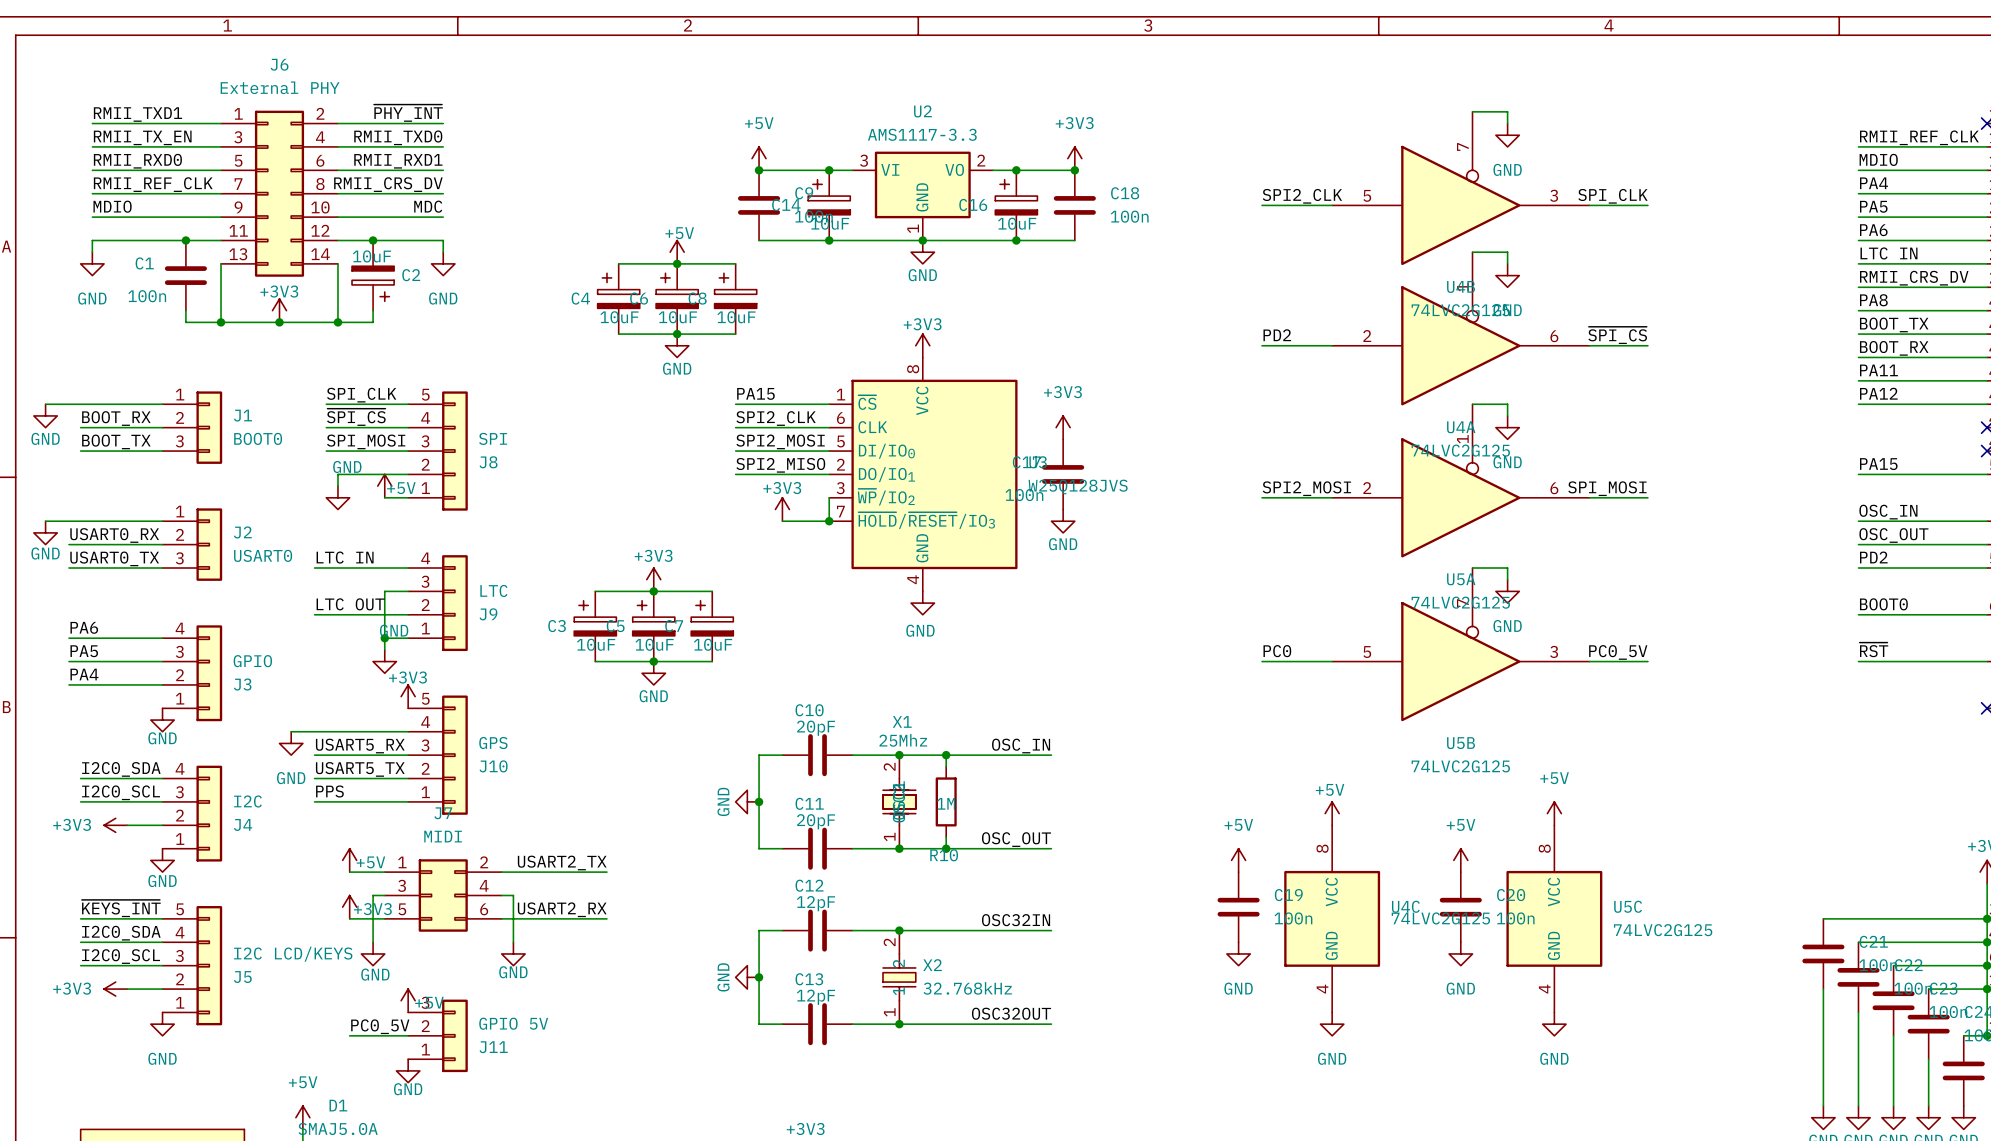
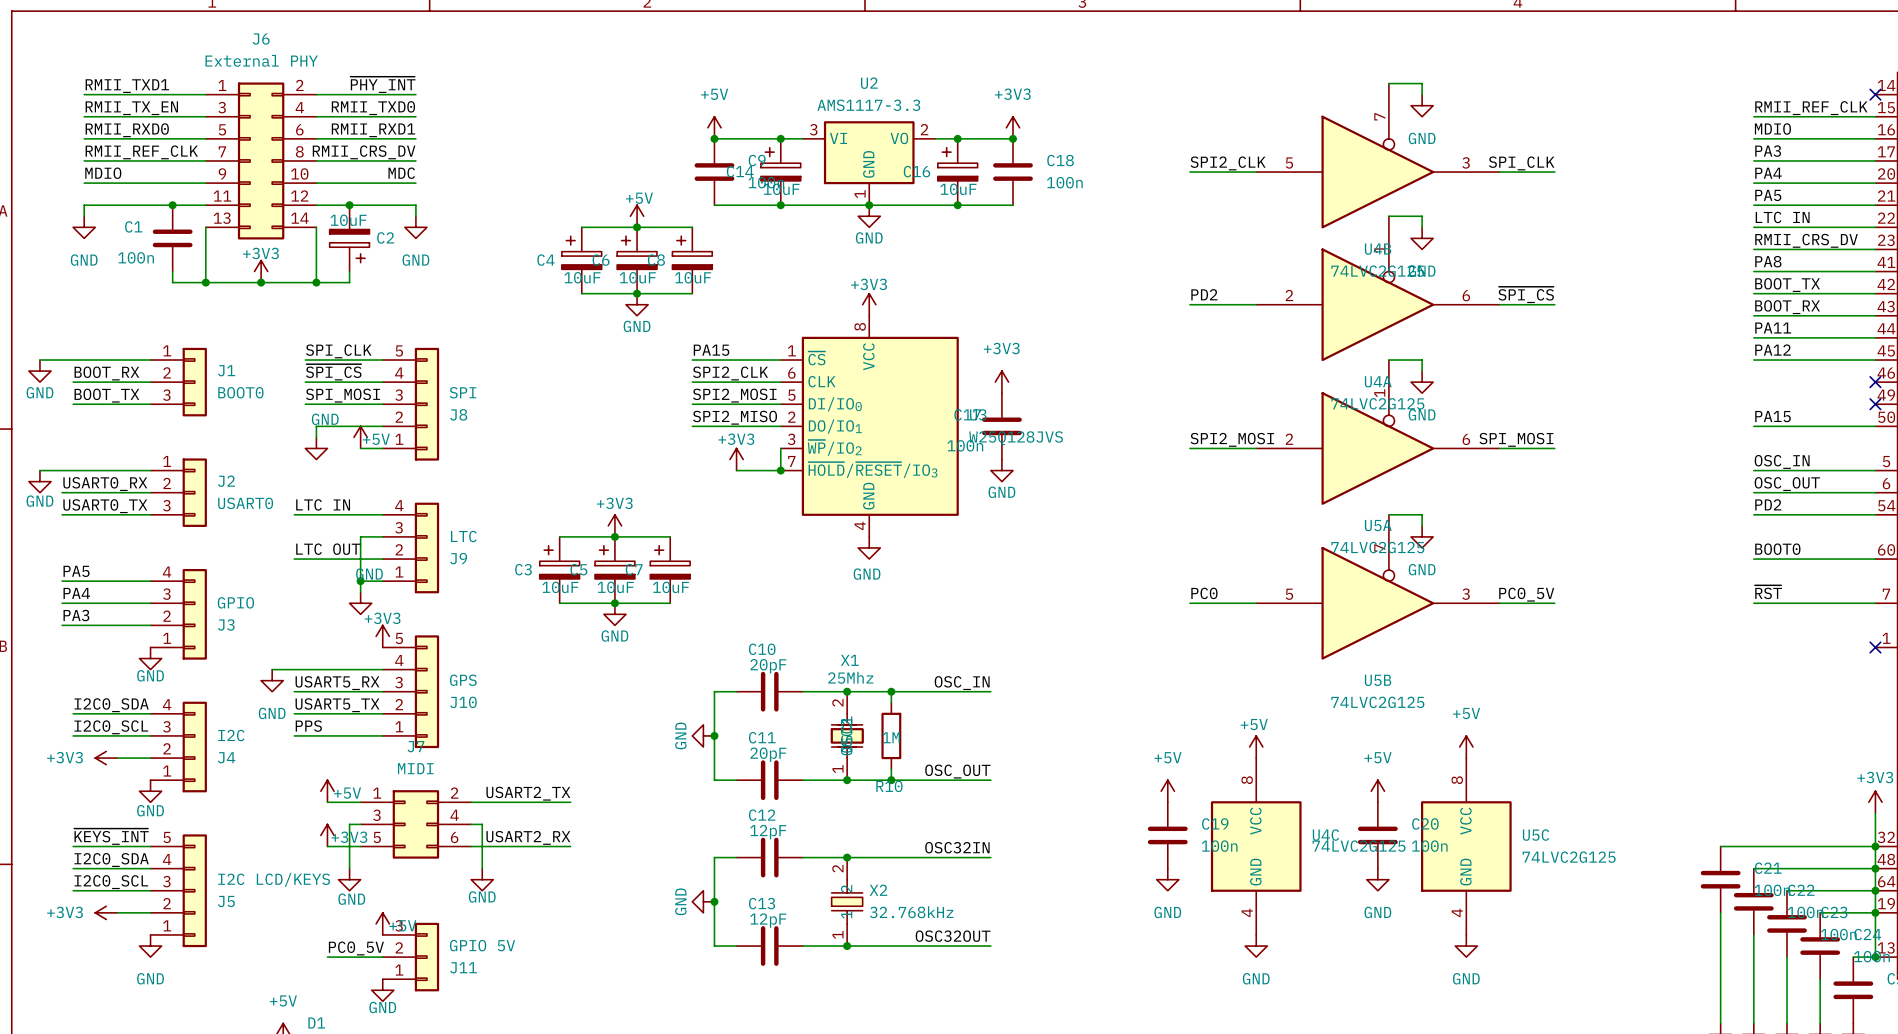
label: PA4 (1874, 183) -> PA3 (1768, 151)
label: PA5 (1873, 206) -> PA4 (1768, 173)
label: PA6 (1873, 230) -> PA5 (1768, 195)
label: PA6 (84, 627) -> PA5 (76, 571)
label: PA5 (84, 651) -> PA4 (76, 593)
label: PA4 (84, 674) -> PA3 (76, 615)

